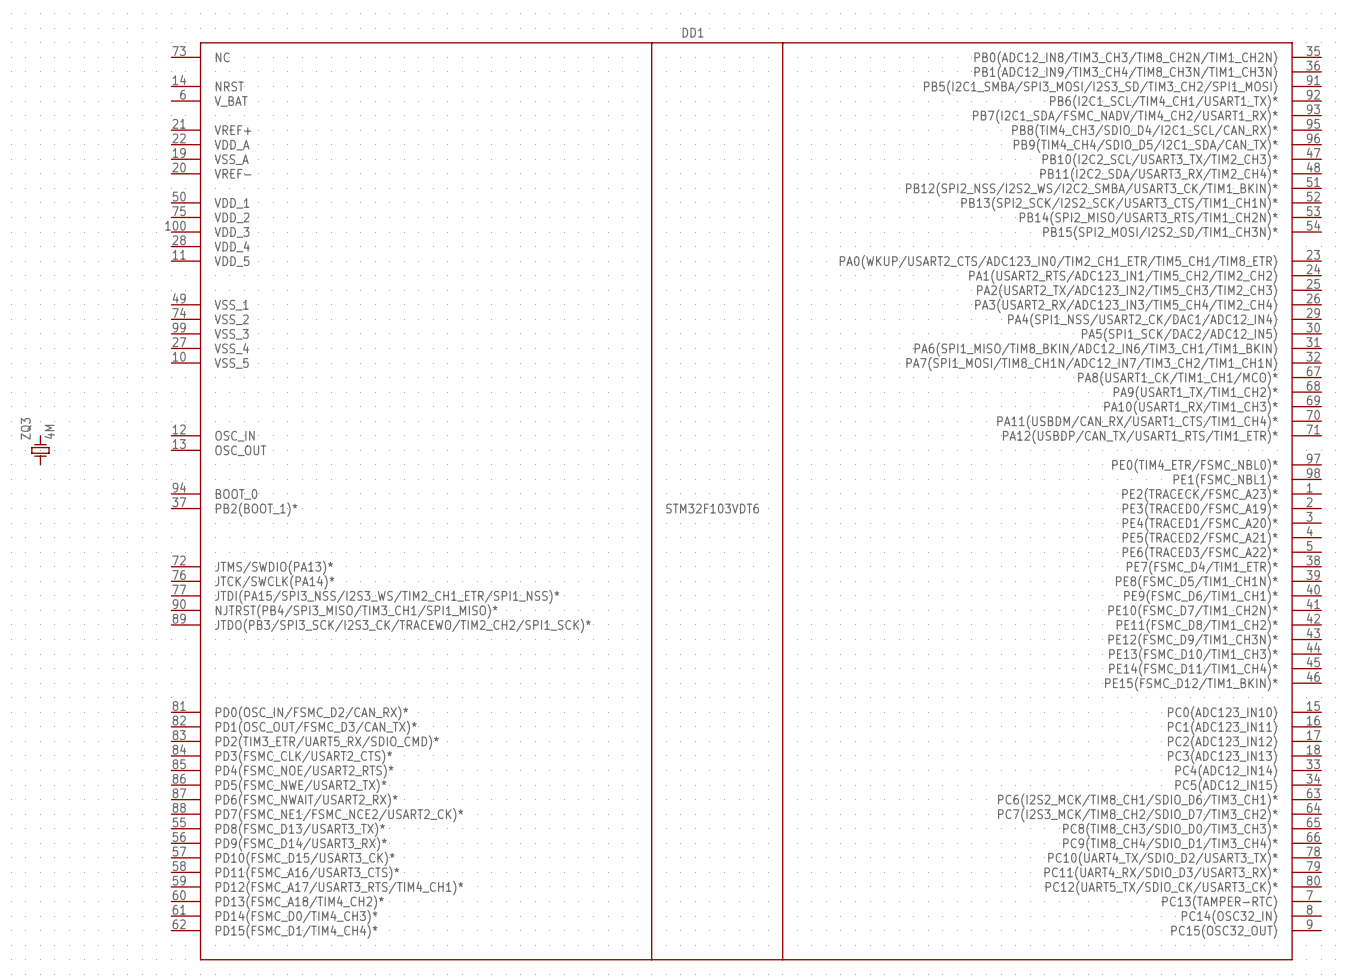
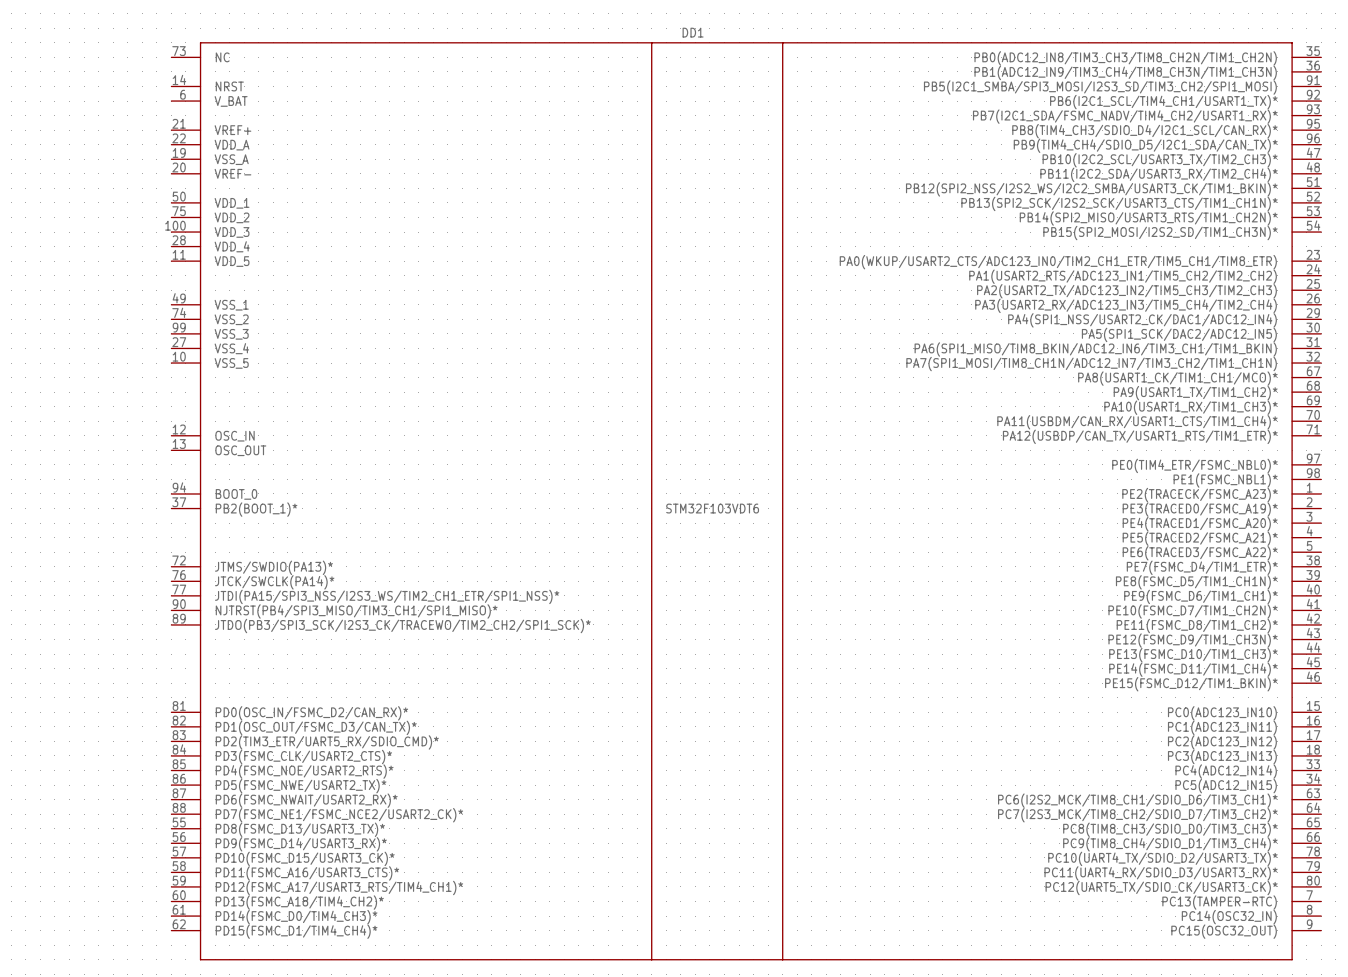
ZQ3: 4M (40, 450) -> none

